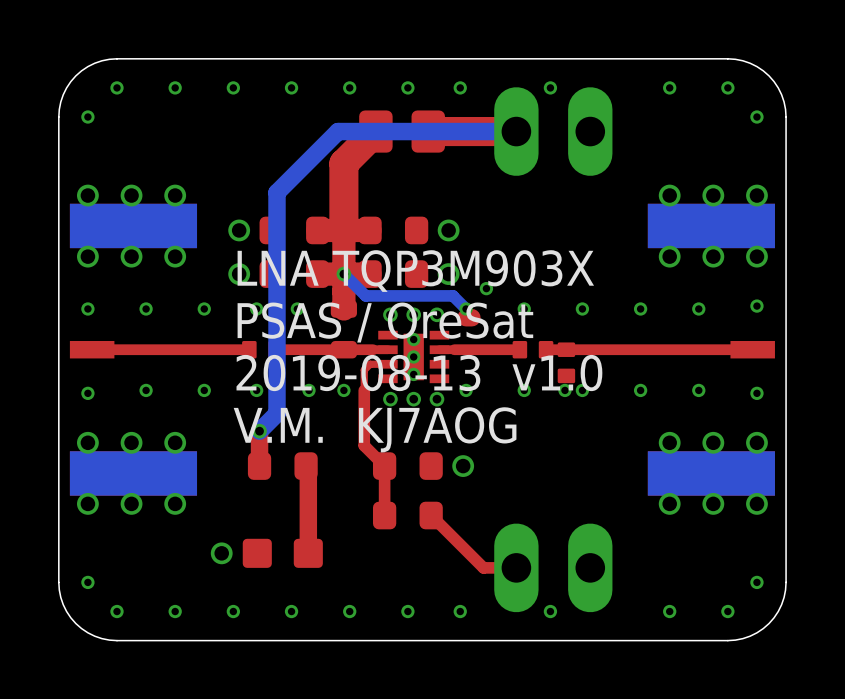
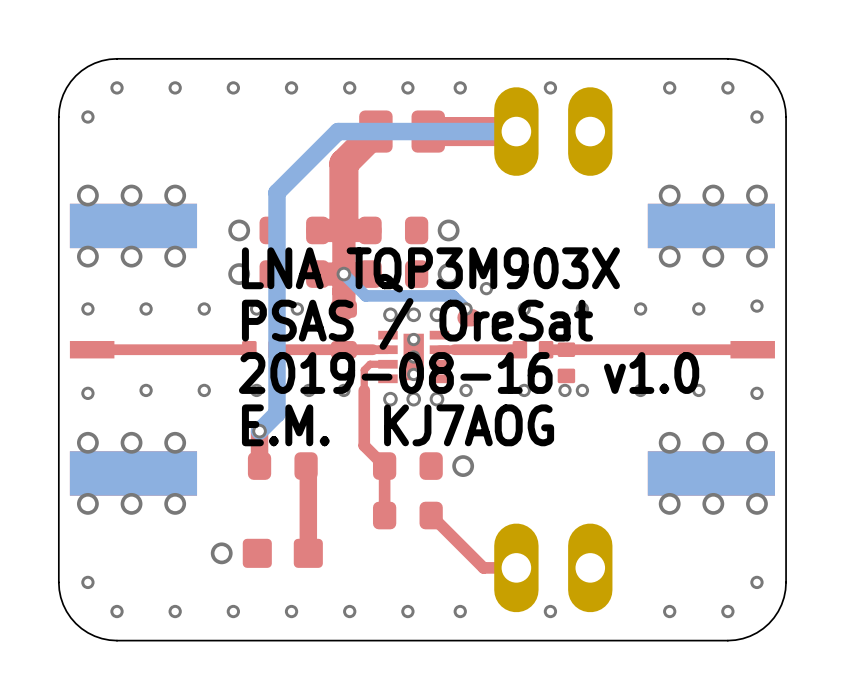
text: 2019-08-13 v1.0 (419, 373) -> 2019-08-16 v1.0 (469, 372)
text: V.M. KJ7AOG (375, 429) -> E.M. KJ7AOG (398, 425)

